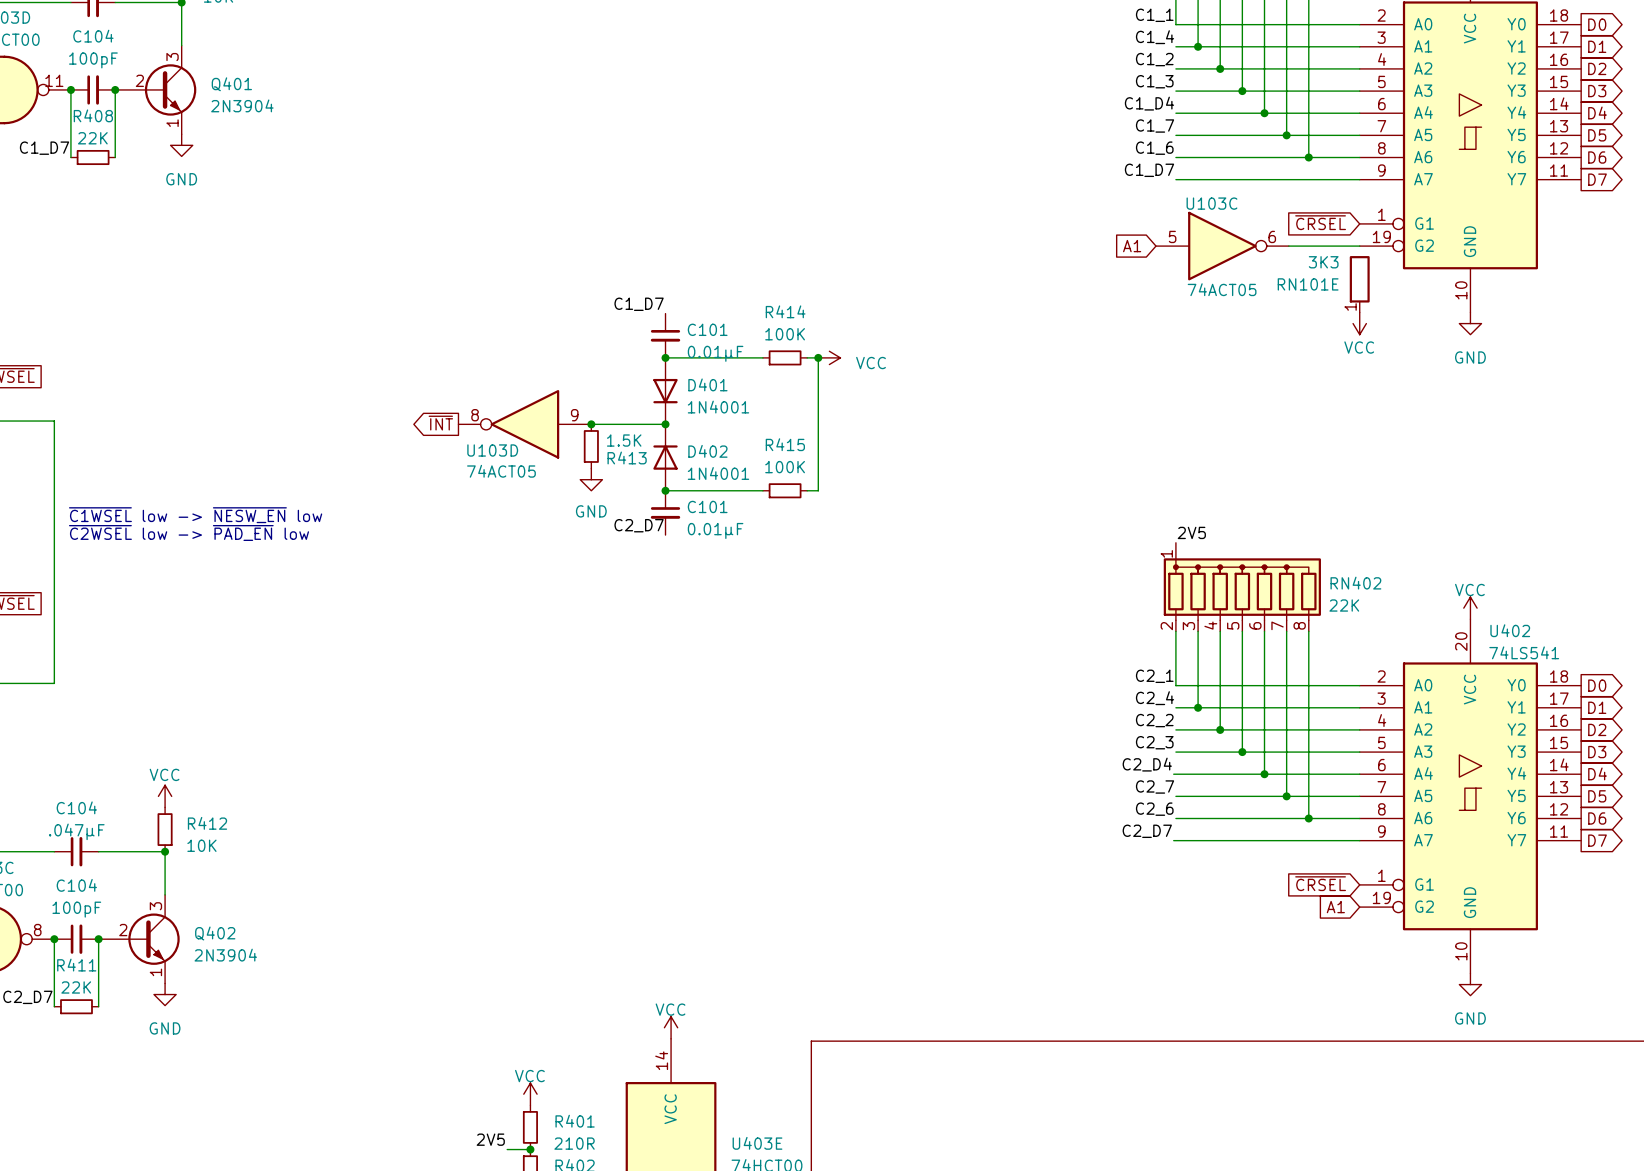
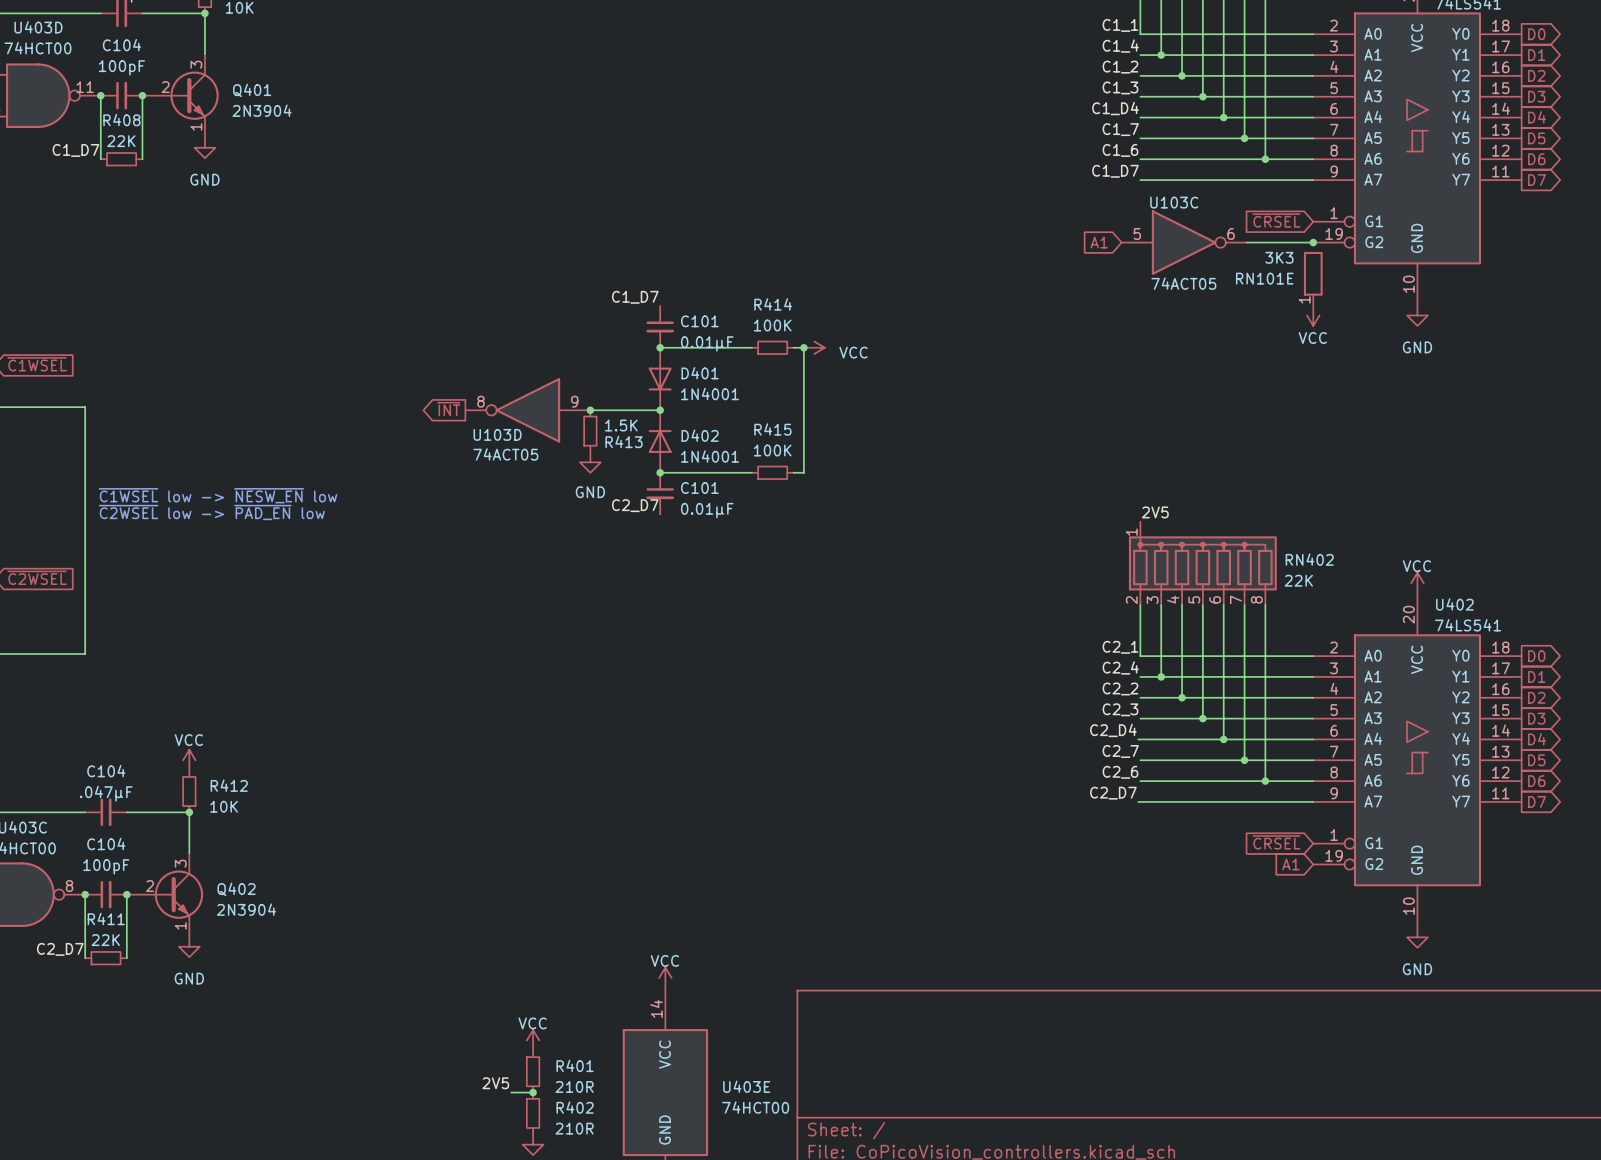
junction: none -> (1313, 242)

